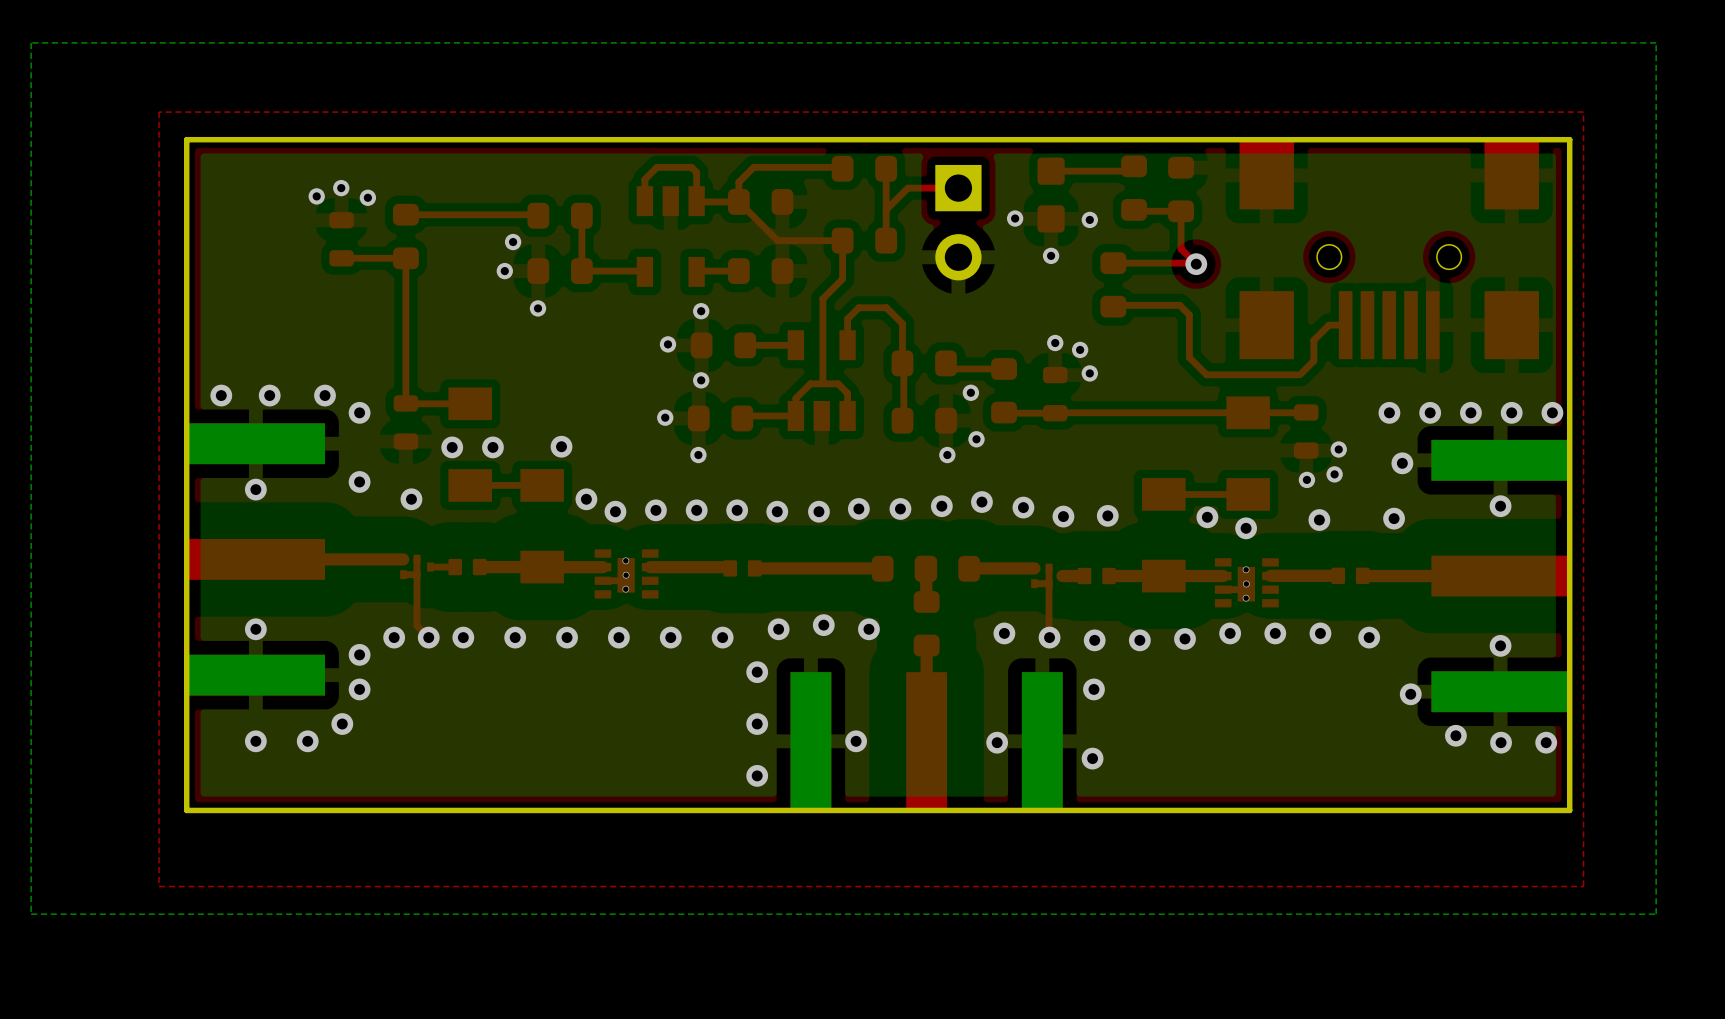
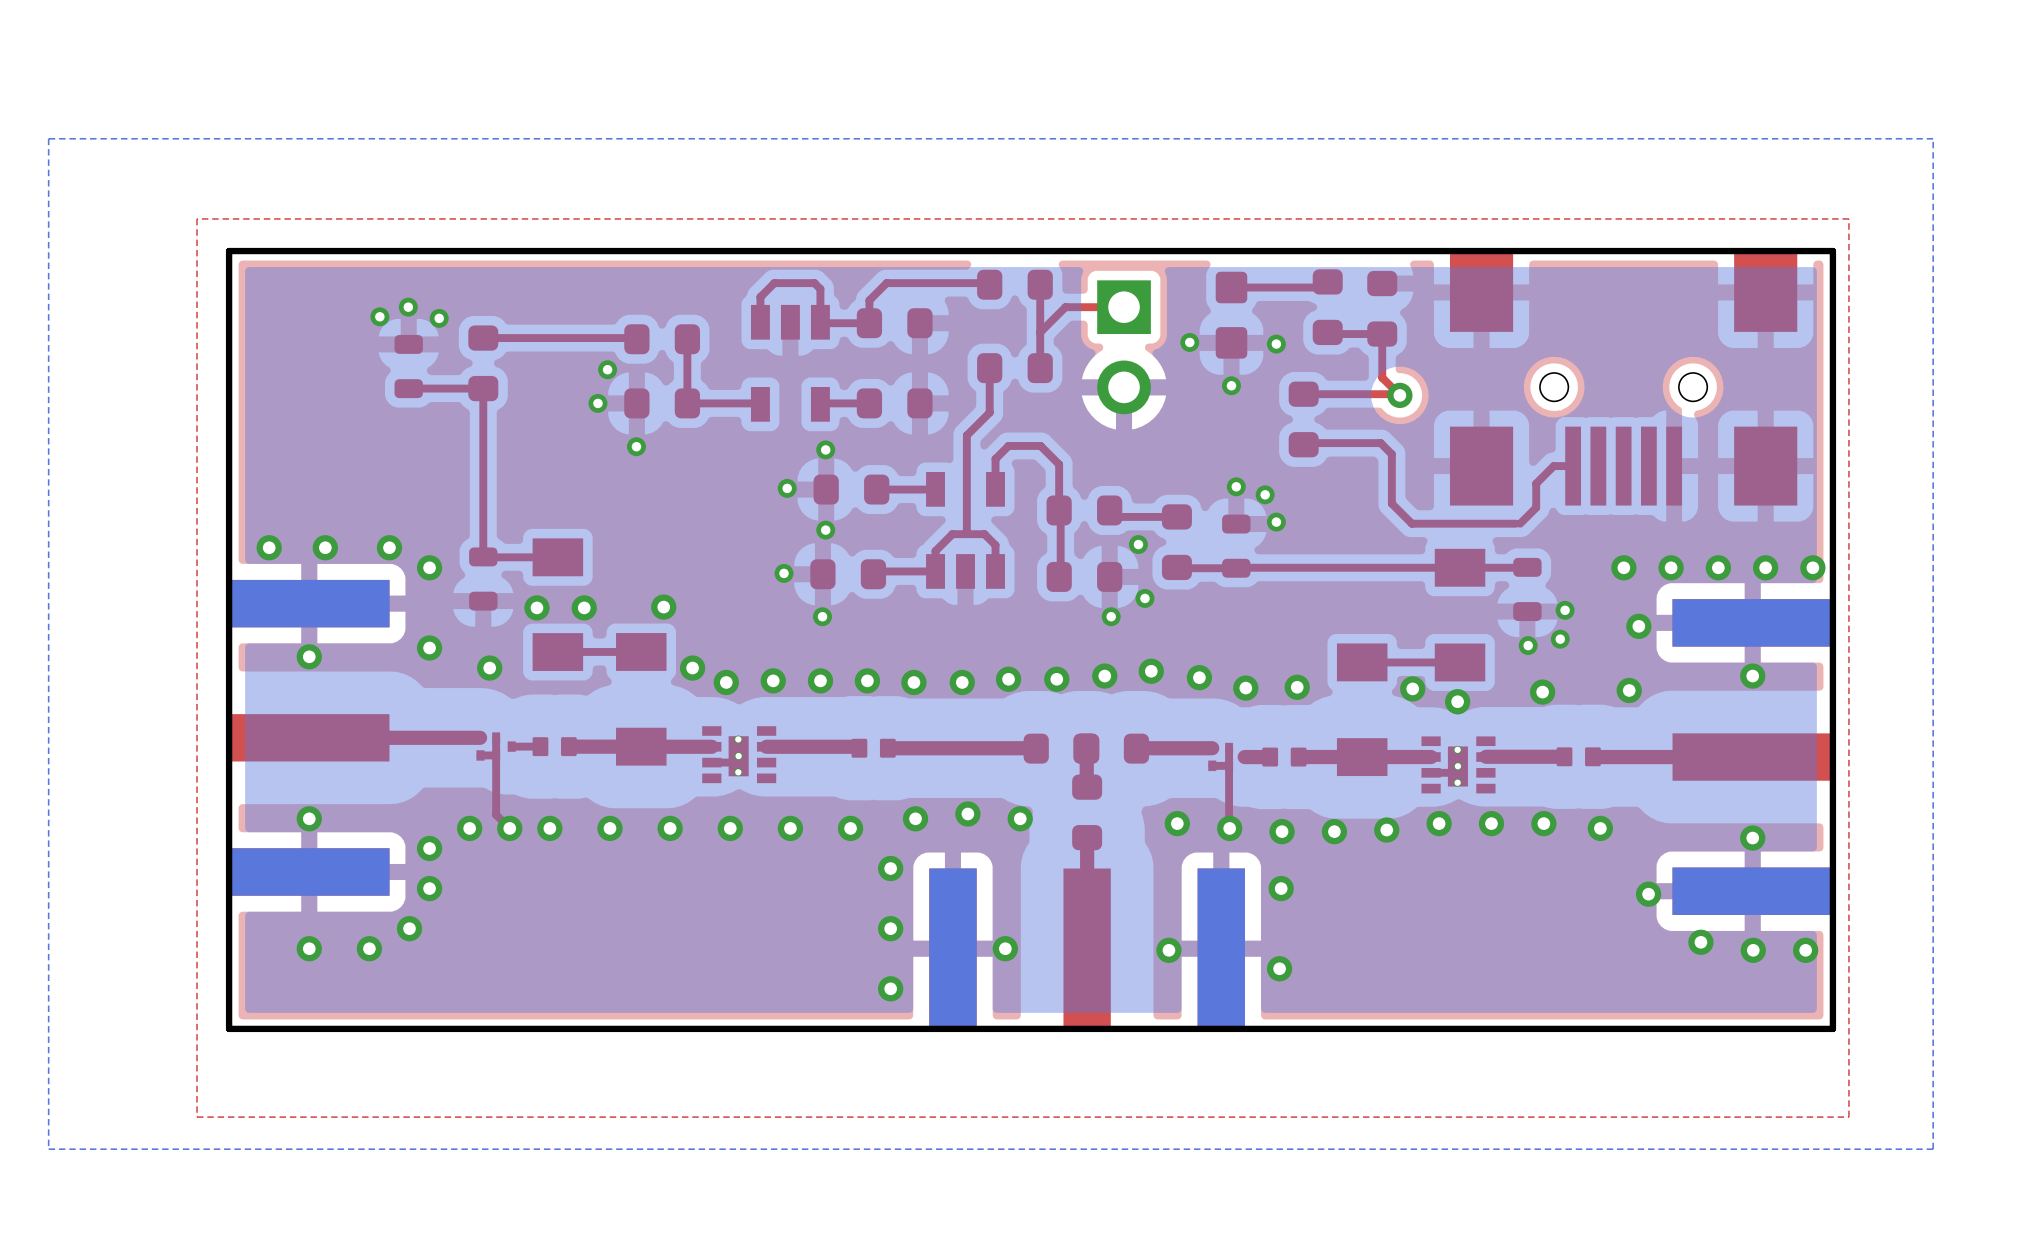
top track: (747, 210) (777, 240) (842, 240) -> none

